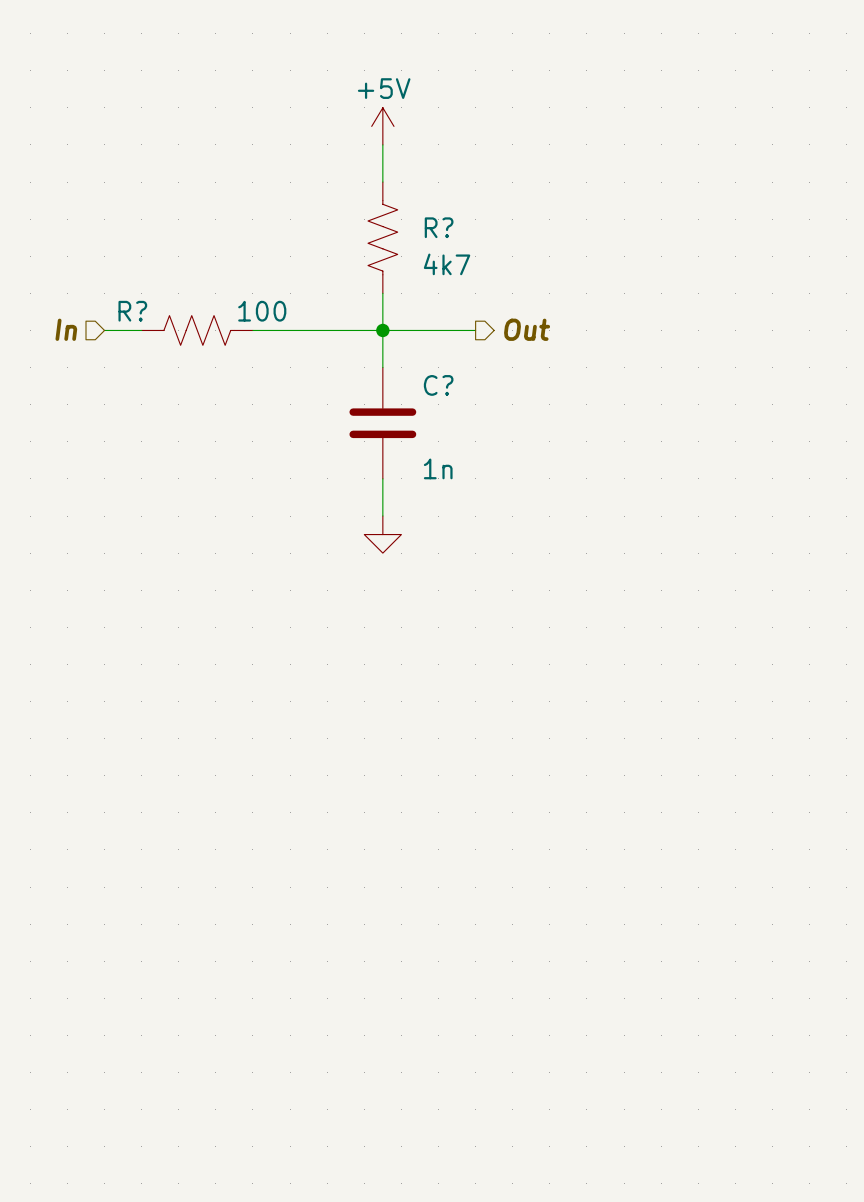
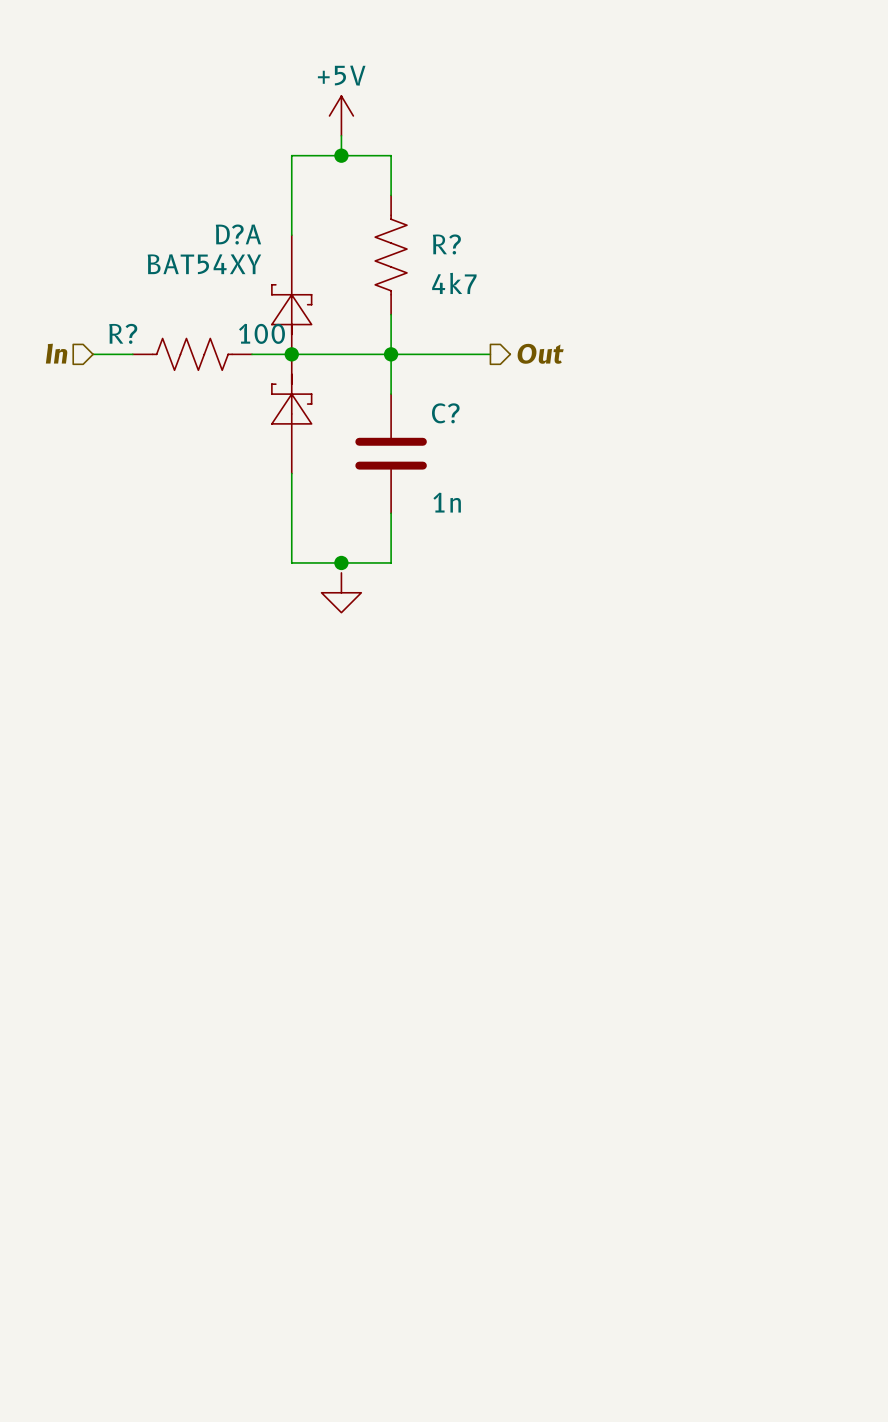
wire: none -> (341, 135) (341, 155)
power symbol position: +5V (382, 126) -> +5V (341, 115)
junction: none -> (341, 155)
wire: none -> (391, 155) (291, 155) (291, 235)
junction: none -> (291, 354)
D?A: none -> BAT54XY (291, 354)
wire: none -> (291, 473) (291, 562) (391, 562) (391, 553)
junction: none -> (341, 562)
power symbol position: (382, 534) -> (341, 592)

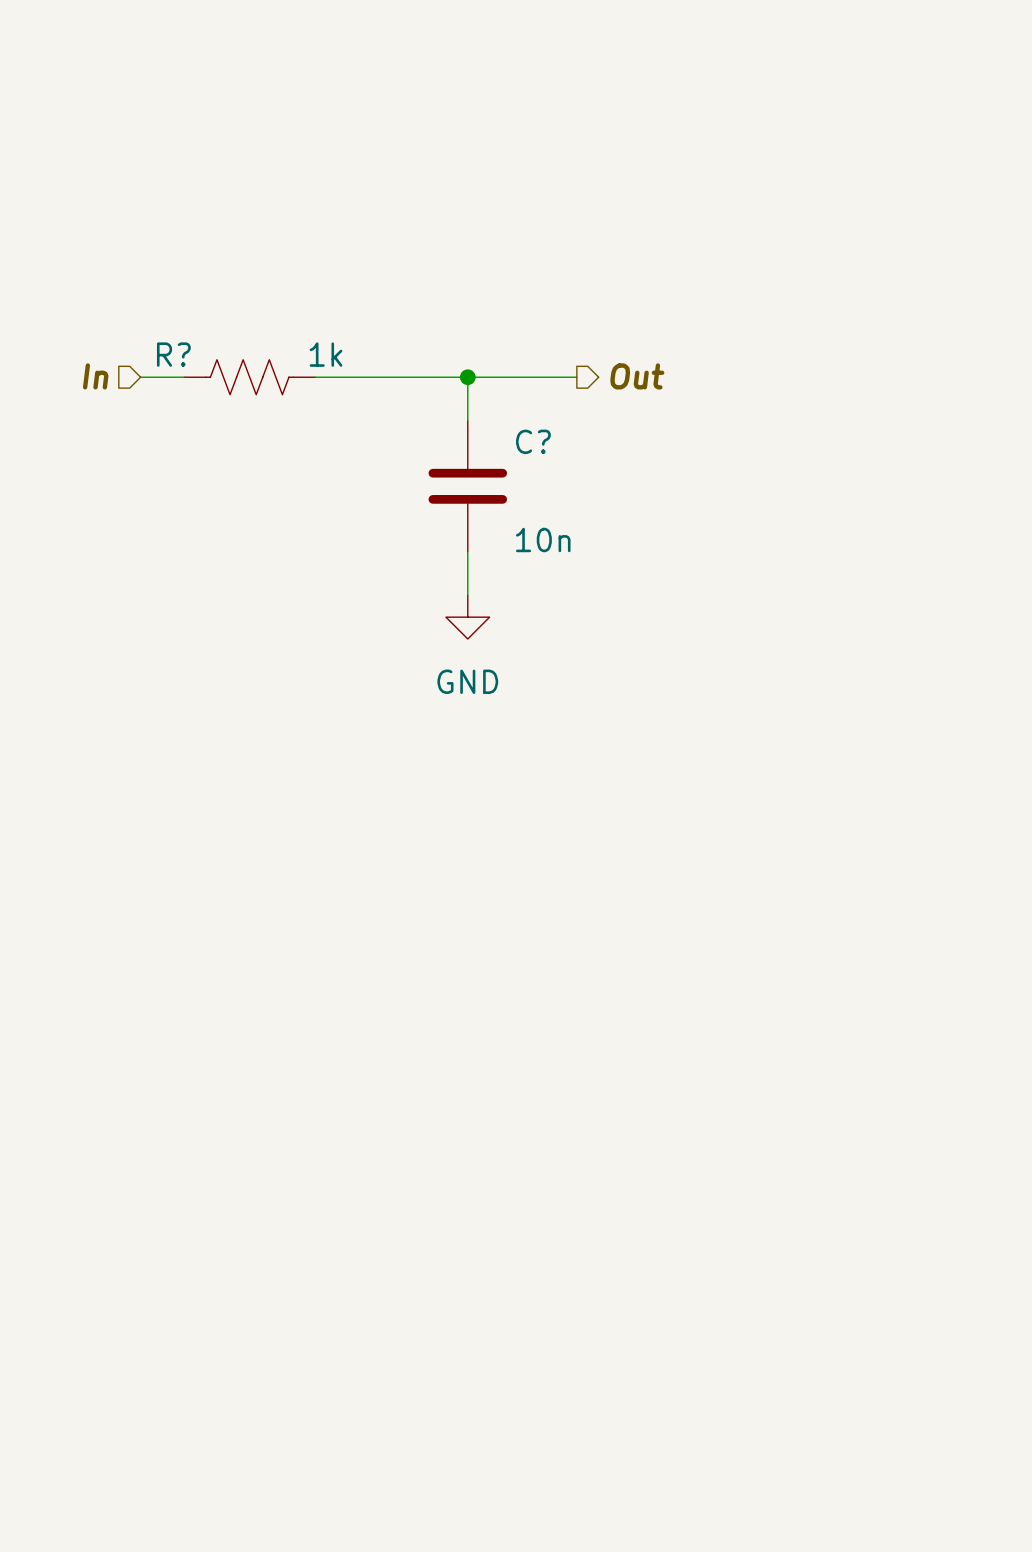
power symbol: +5V (341, 115) -> none
wire: (341, 135) (341, 155) -> none
junction: (341, 155) -> none
wire: (391, 195) (391, 155) (291, 155) (291, 235) -> none
R?: 4k7 (391, 255) -> none
wire: (391, 314) (391, 354) -> none
R? value: 100 (261, 333) -> 1k (326, 354)
junction: (291, 354) -> none
D?A: BAT54XY (291, 354) -> none
wire: (291, 473) (291, 562) (391, 562) (391, 553) -> none
C? value: 1n (447, 502) -> 10n (543, 540)
junction: (341, 562) -> none
power symbol: none -> GND (467, 617)
power symbol: (341, 592) -> none

